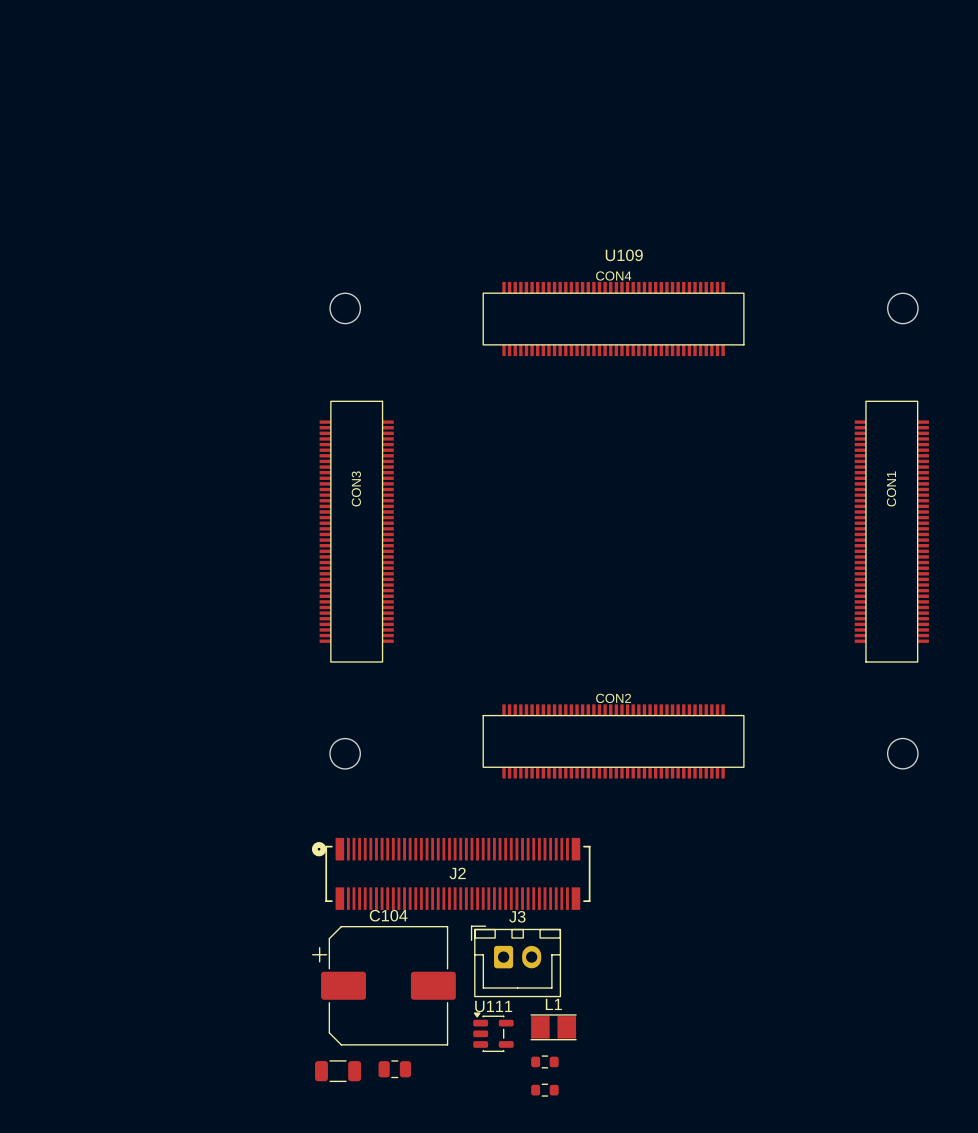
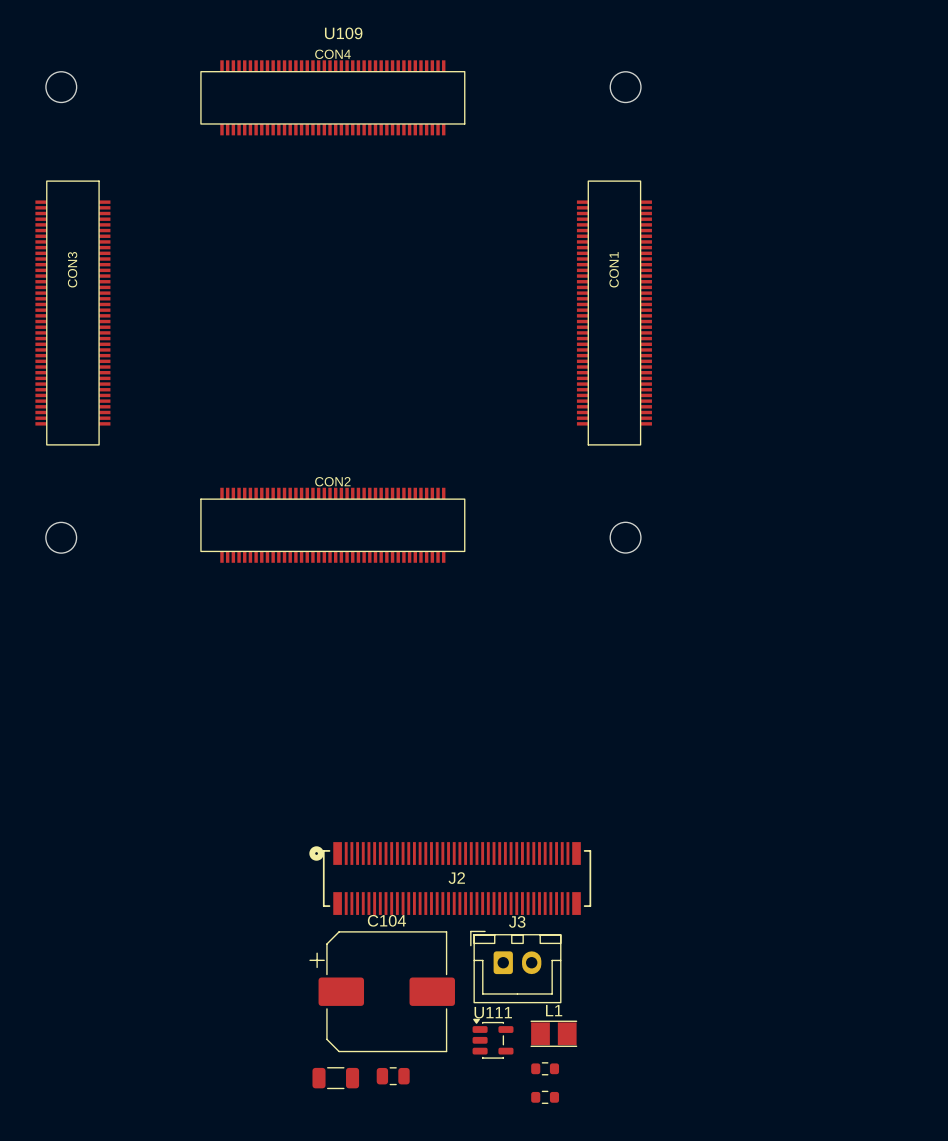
U109 position: (624, 530) -> (343, 311)

